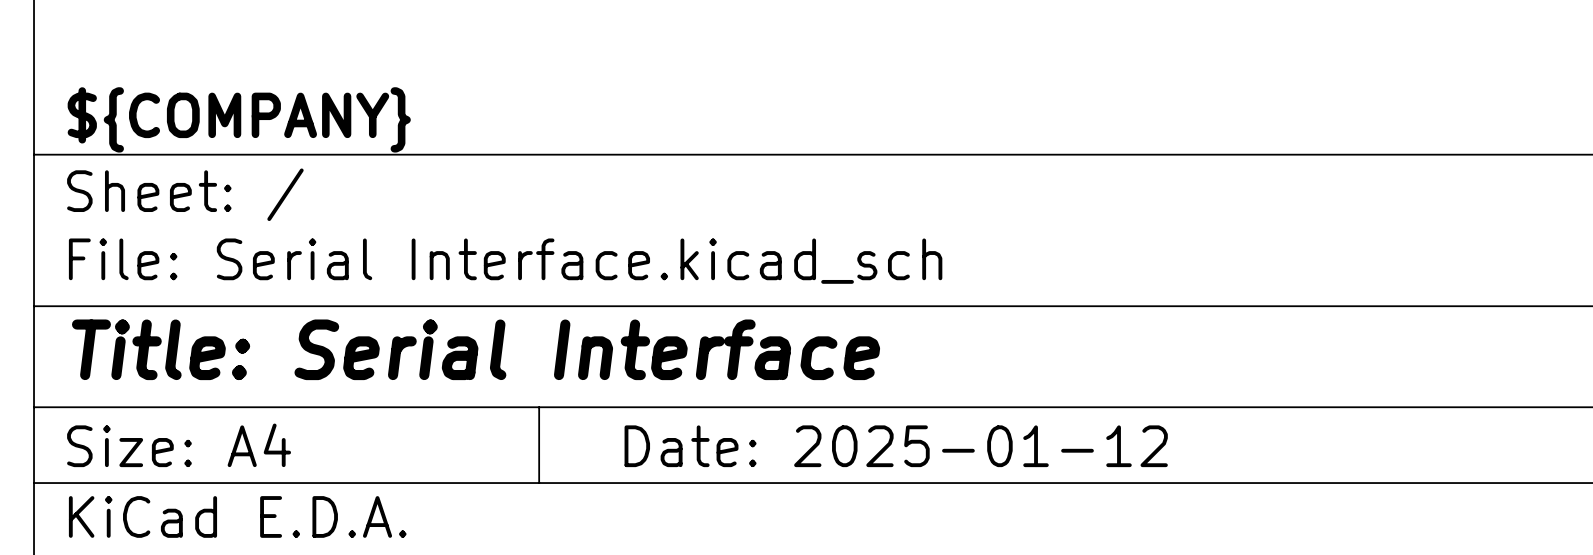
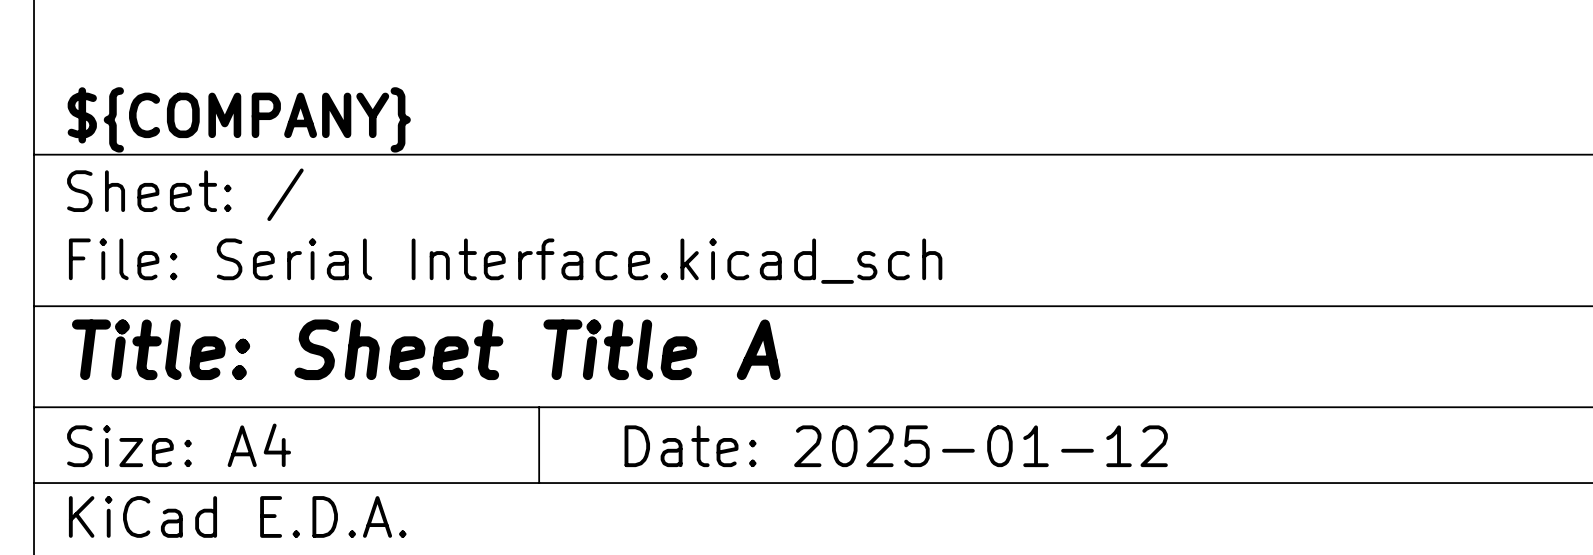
title block: Title: Serial Interface (476, 349) -> Title: Sheet Title A (426, 349)

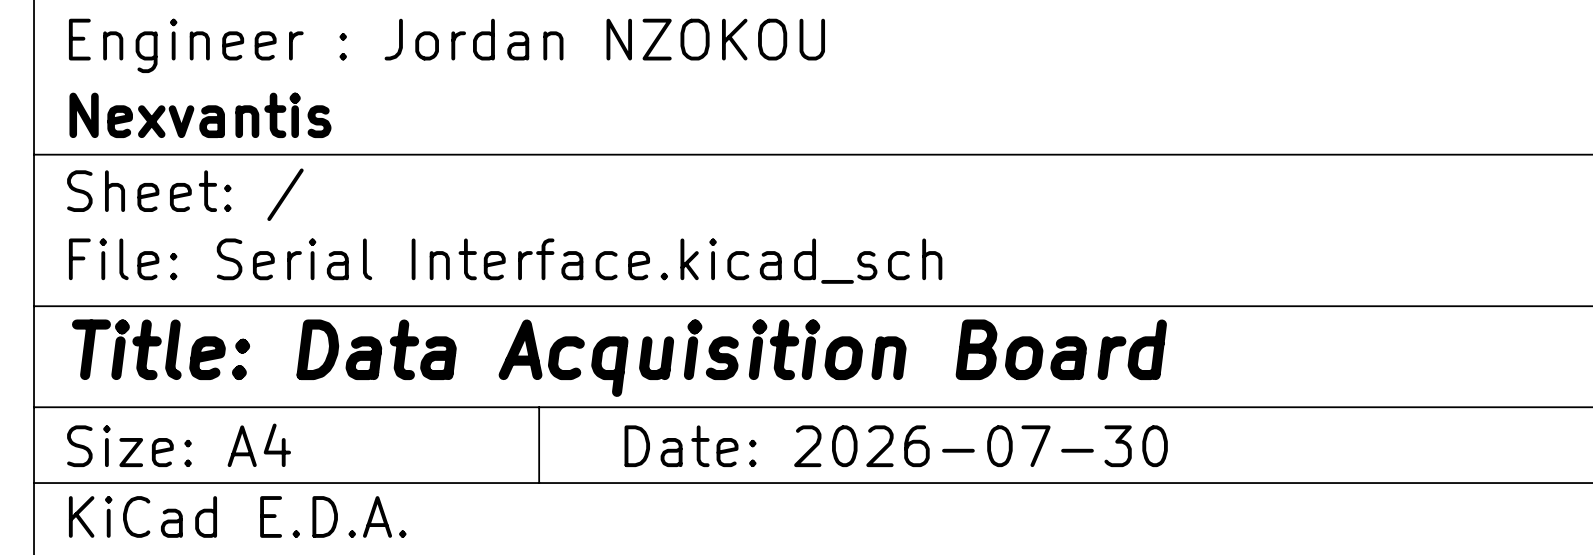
title block: none -> Engineer : Jordan NZOKOU (446, 45)
title block: ${COMPANY} (239, 119) -> Nexvantis (200, 115)
title block: Title: Sheet Title A (426, 349) -> Title: Data Acquisition Board (619, 358)
title block: Date: 2025-01-12 (896, 446) -> Date: 2026-07-30 (896, 446)

